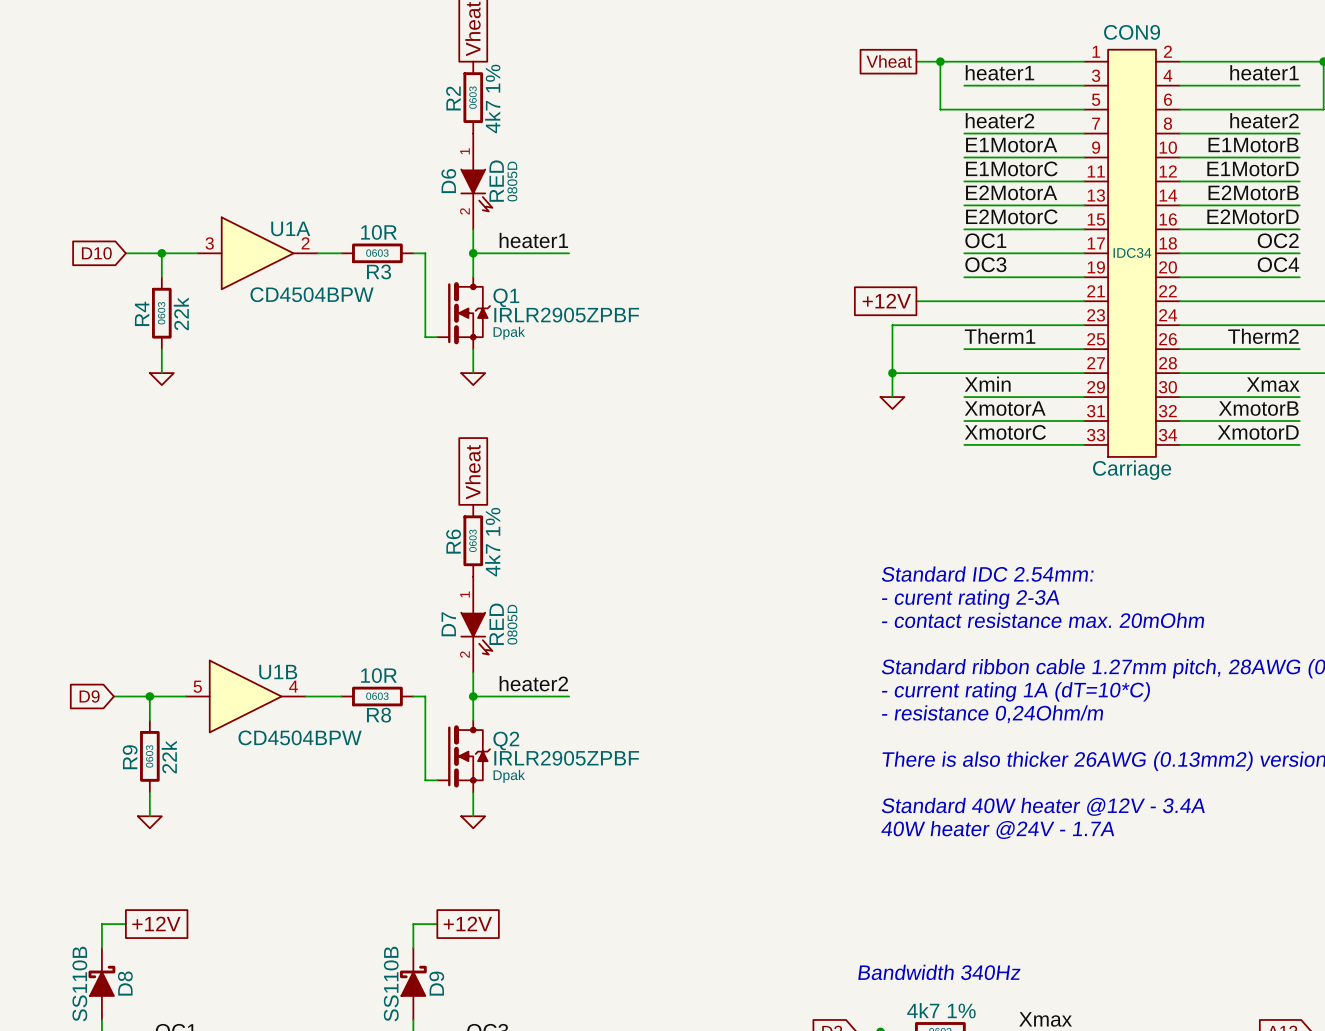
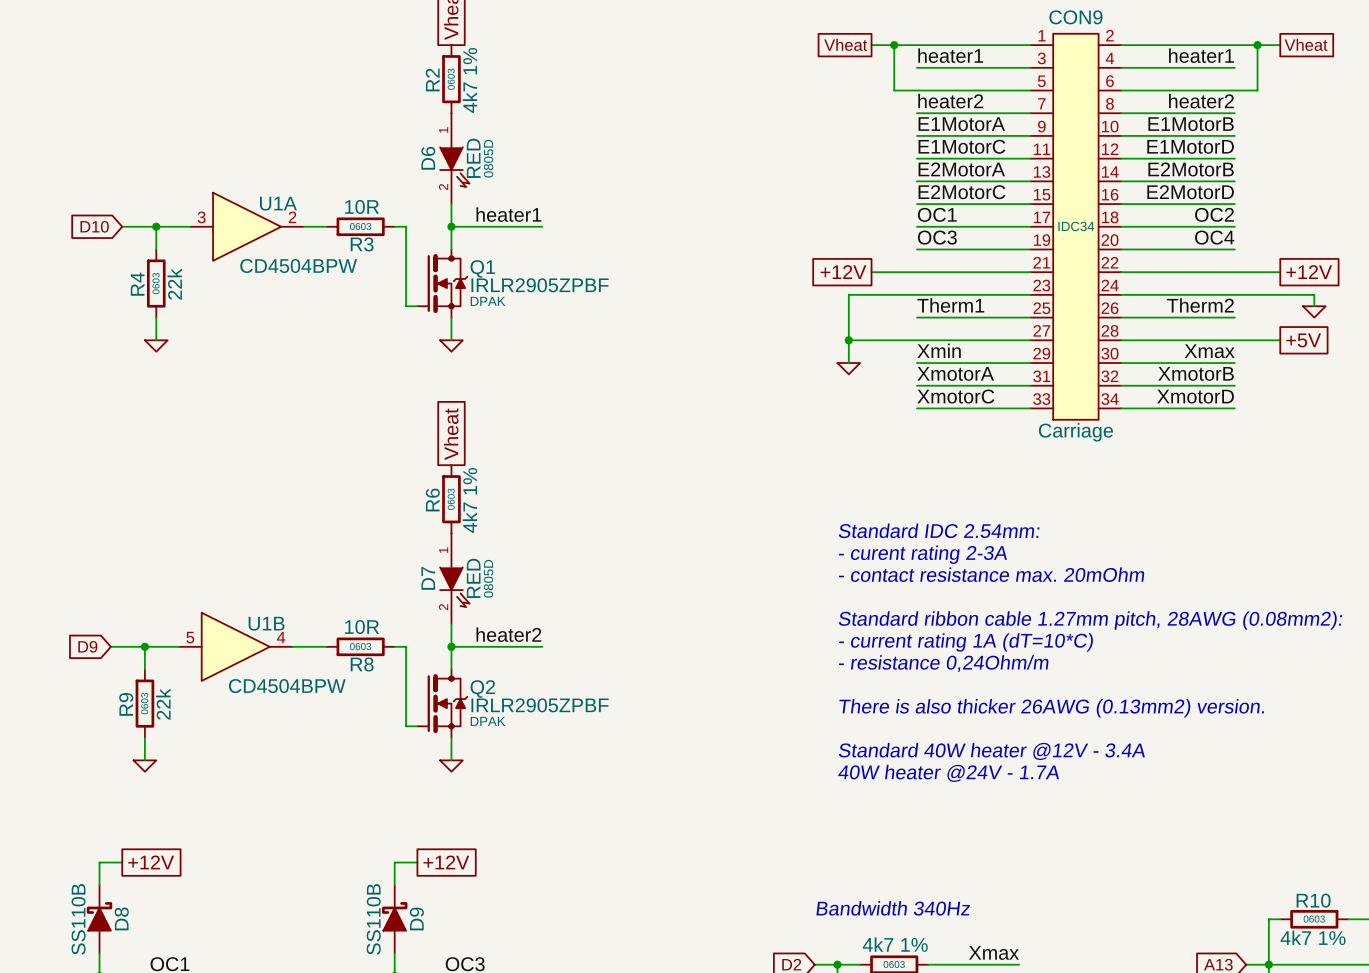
Q1 text: Dpak (509, 333) -> DPAK (488, 301)
Q2 text: Dpak (509, 776) -> DPAK (488, 721)

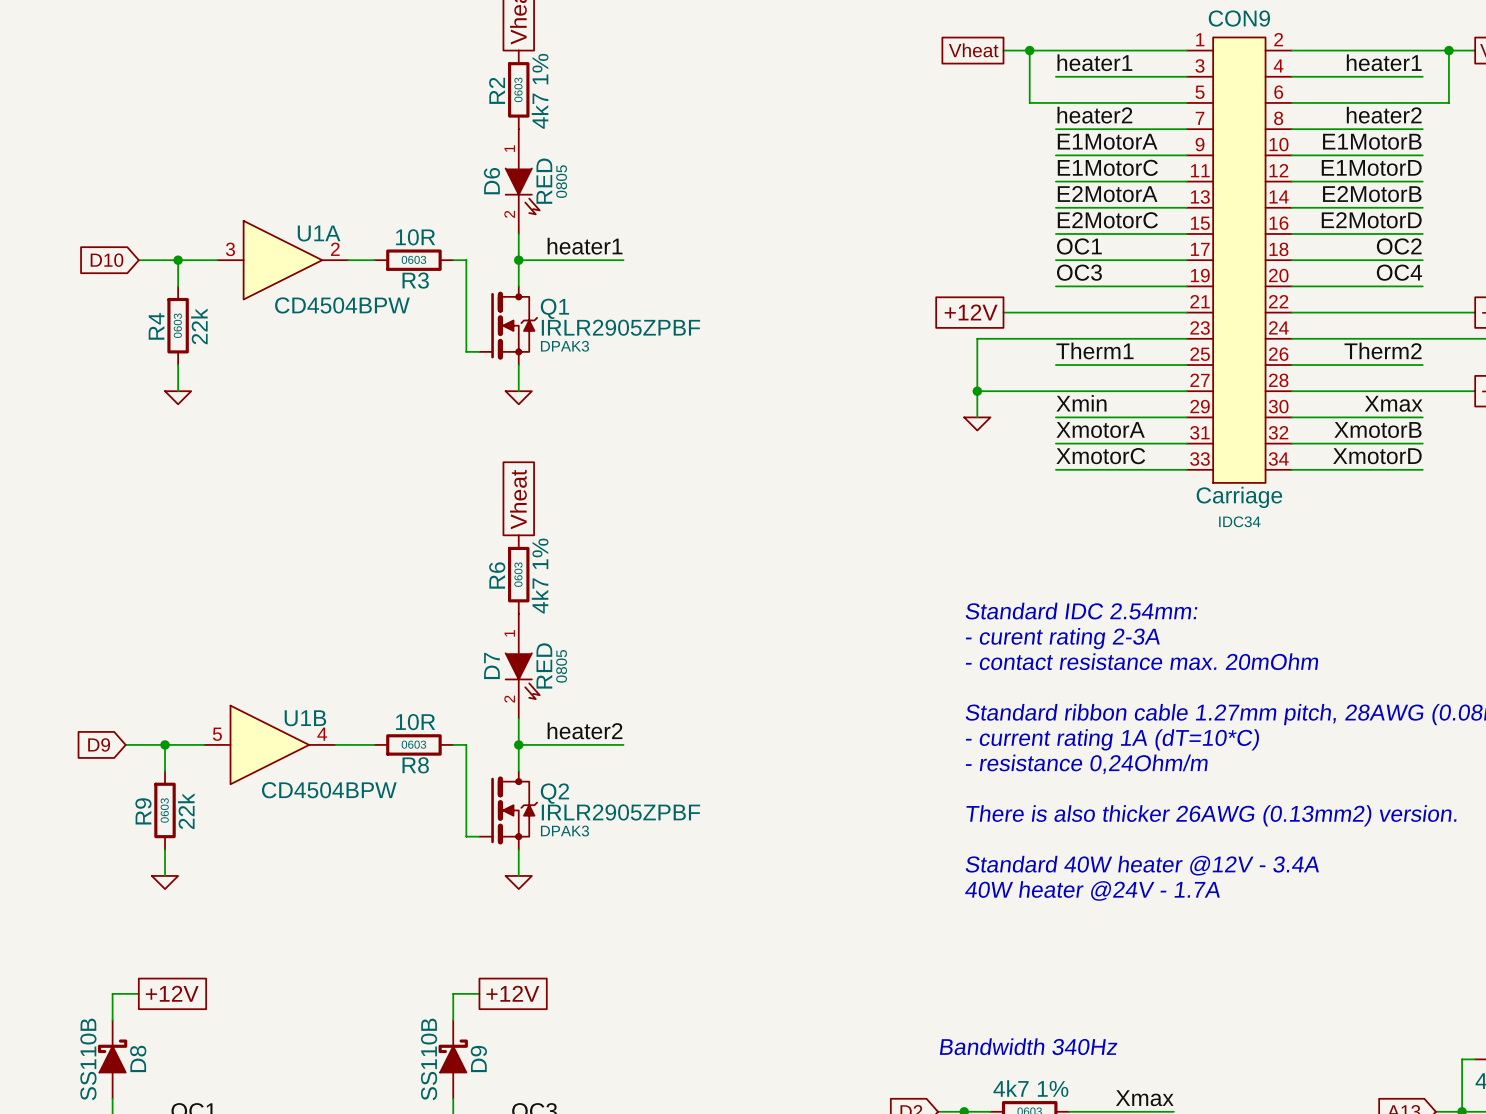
D6 text: 0805D (488, 158) -> 0805 (561, 181)
CON9 text position: IDC34 (1076, 226) -> IDC34 (1239, 521)
Q1 text: DPAK (488, 301) -> DPAK3 (564, 346)
D7 text: 0805D (488, 578) -> 0805 (561, 666)
Q2 text: DPAK (488, 721) -> DPAK3 (564, 831)

